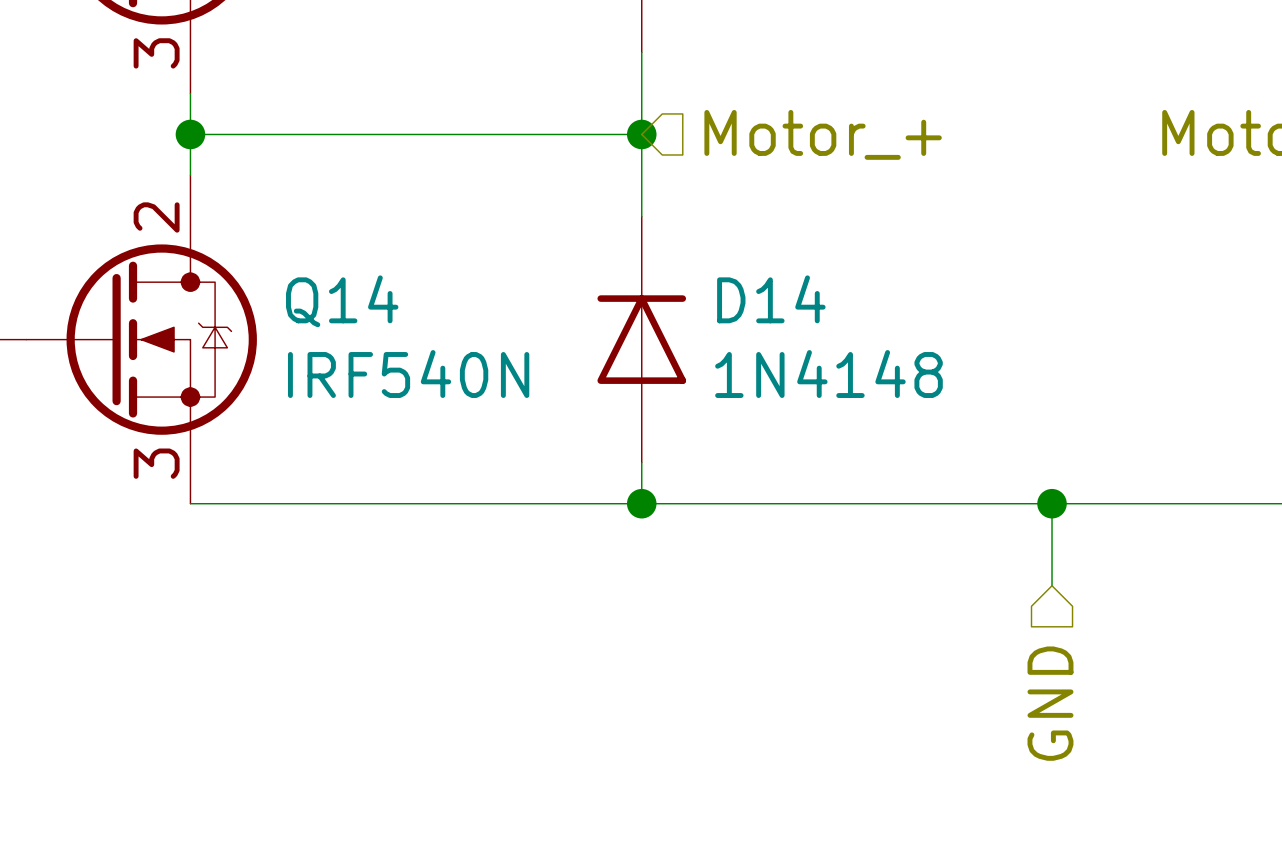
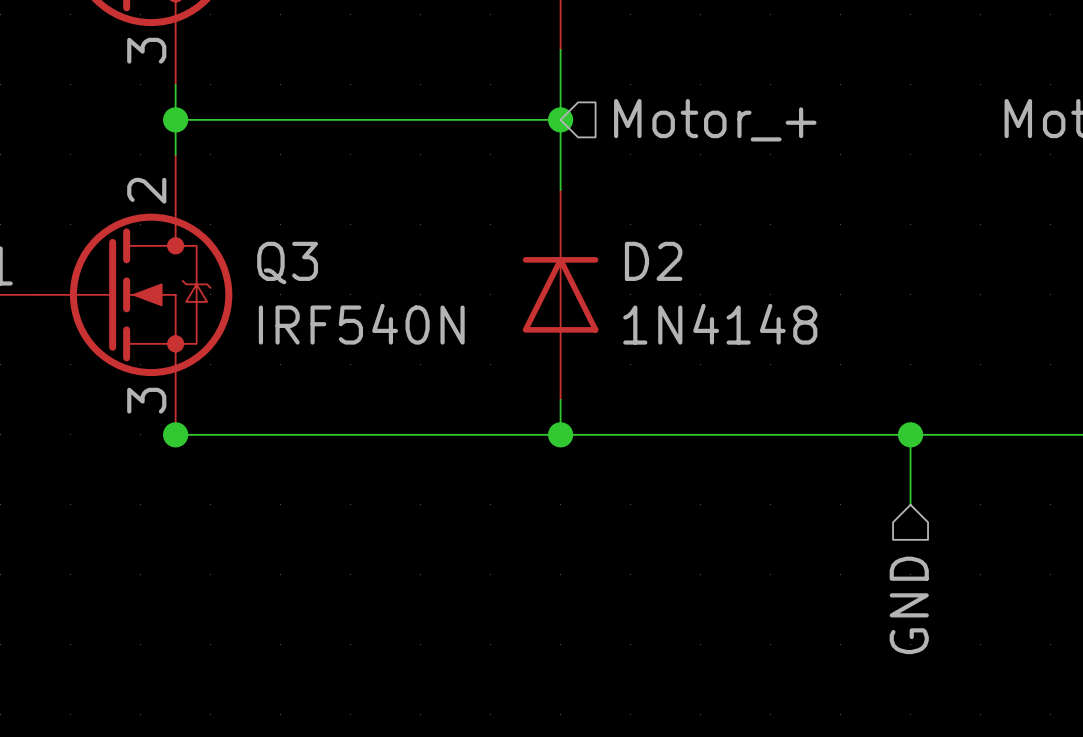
D14 name: D14 (771, 299) -> D2 (653, 261)
Q14 name: Q14 (342, 301) -> Q3 (287, 263)
junction: none -> (175, 434)

